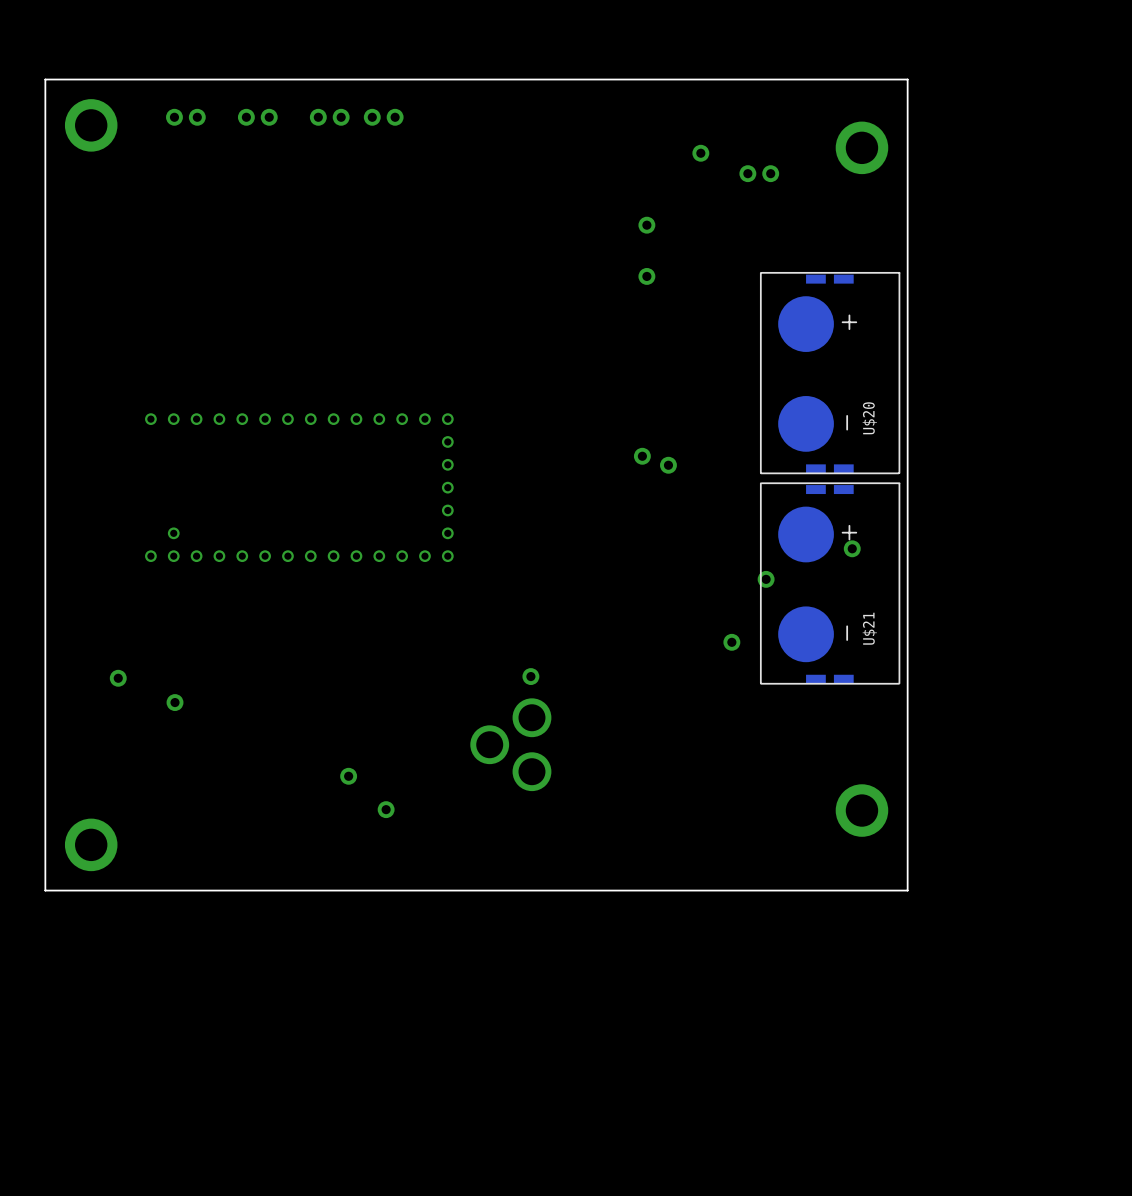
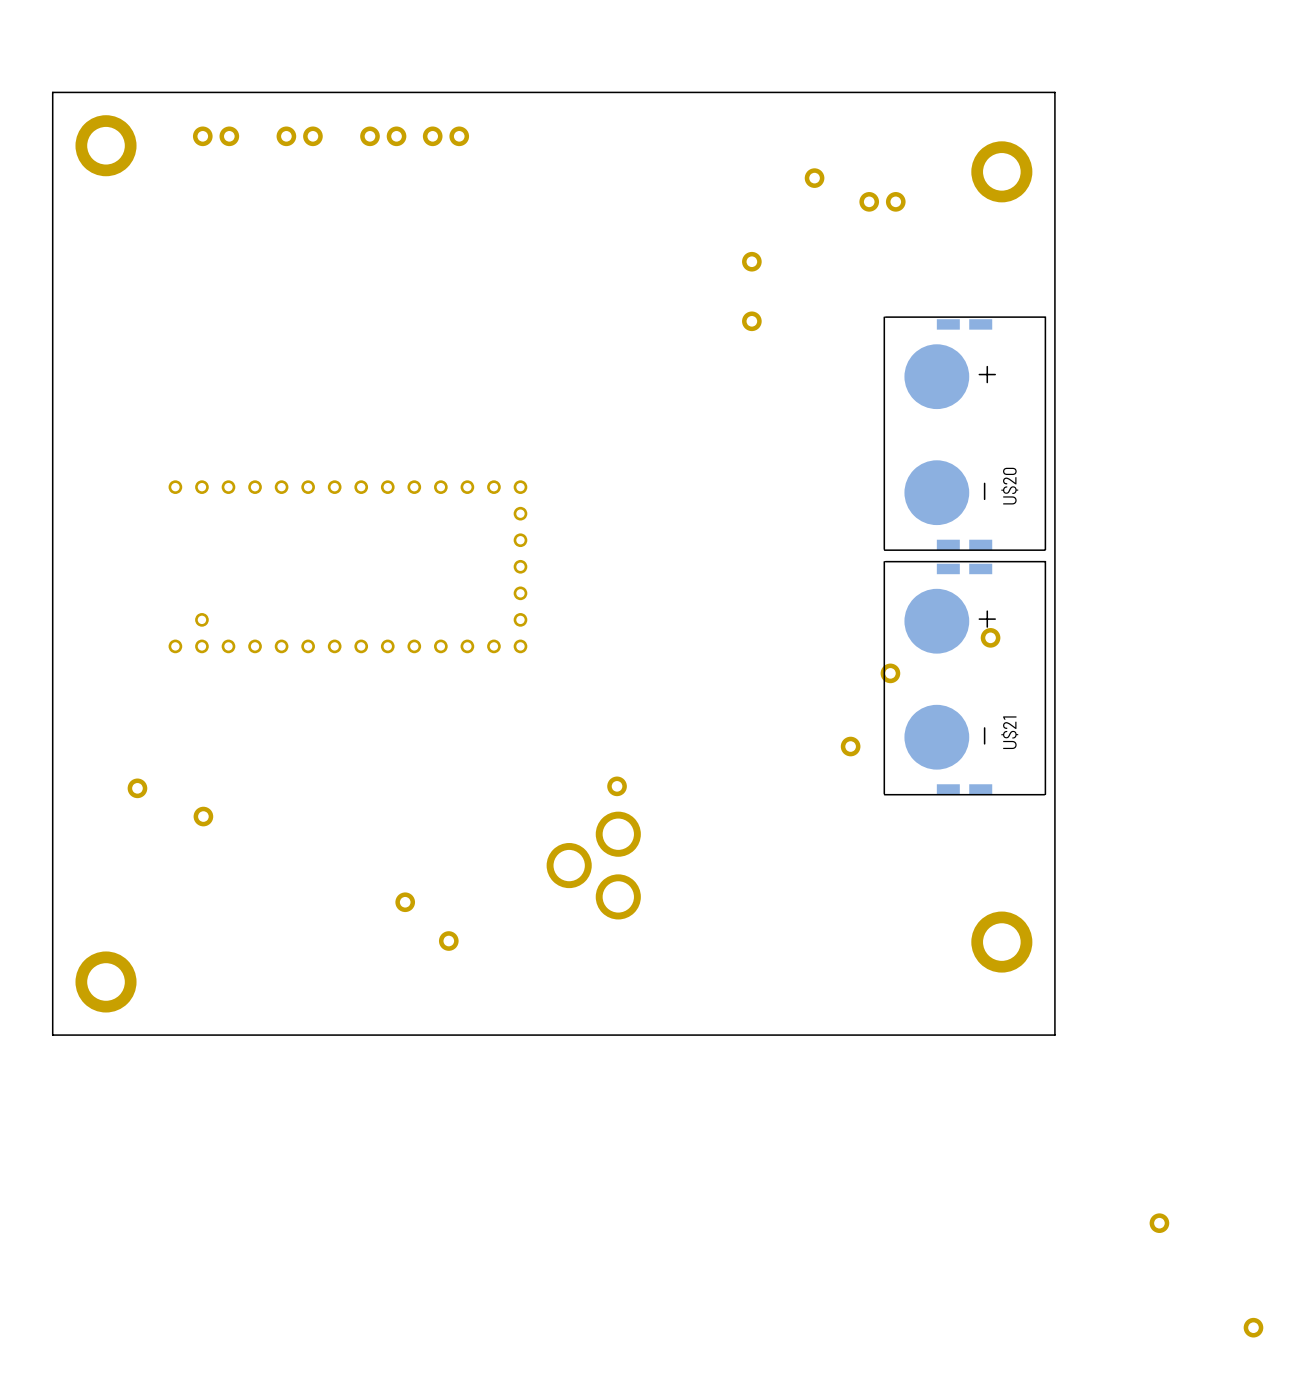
part: (642, 456) -> none
part: (668, 465) -> none
part: none -> (1159, 1223)
part: none -> (1253, 1327)

